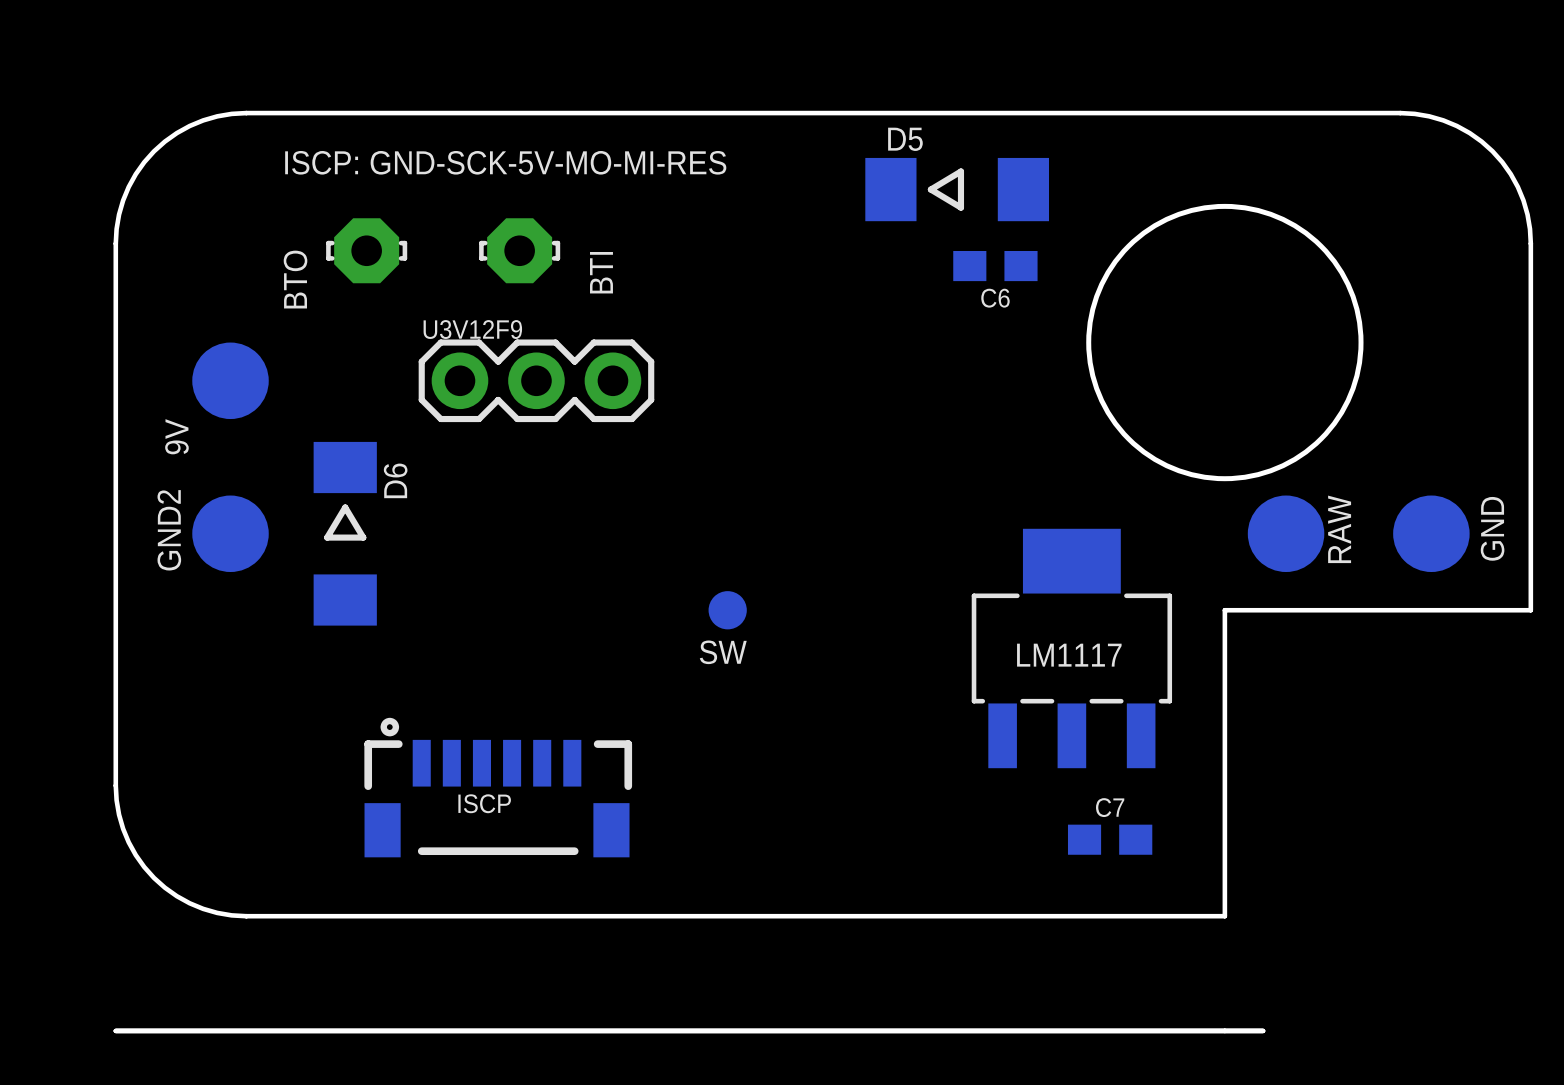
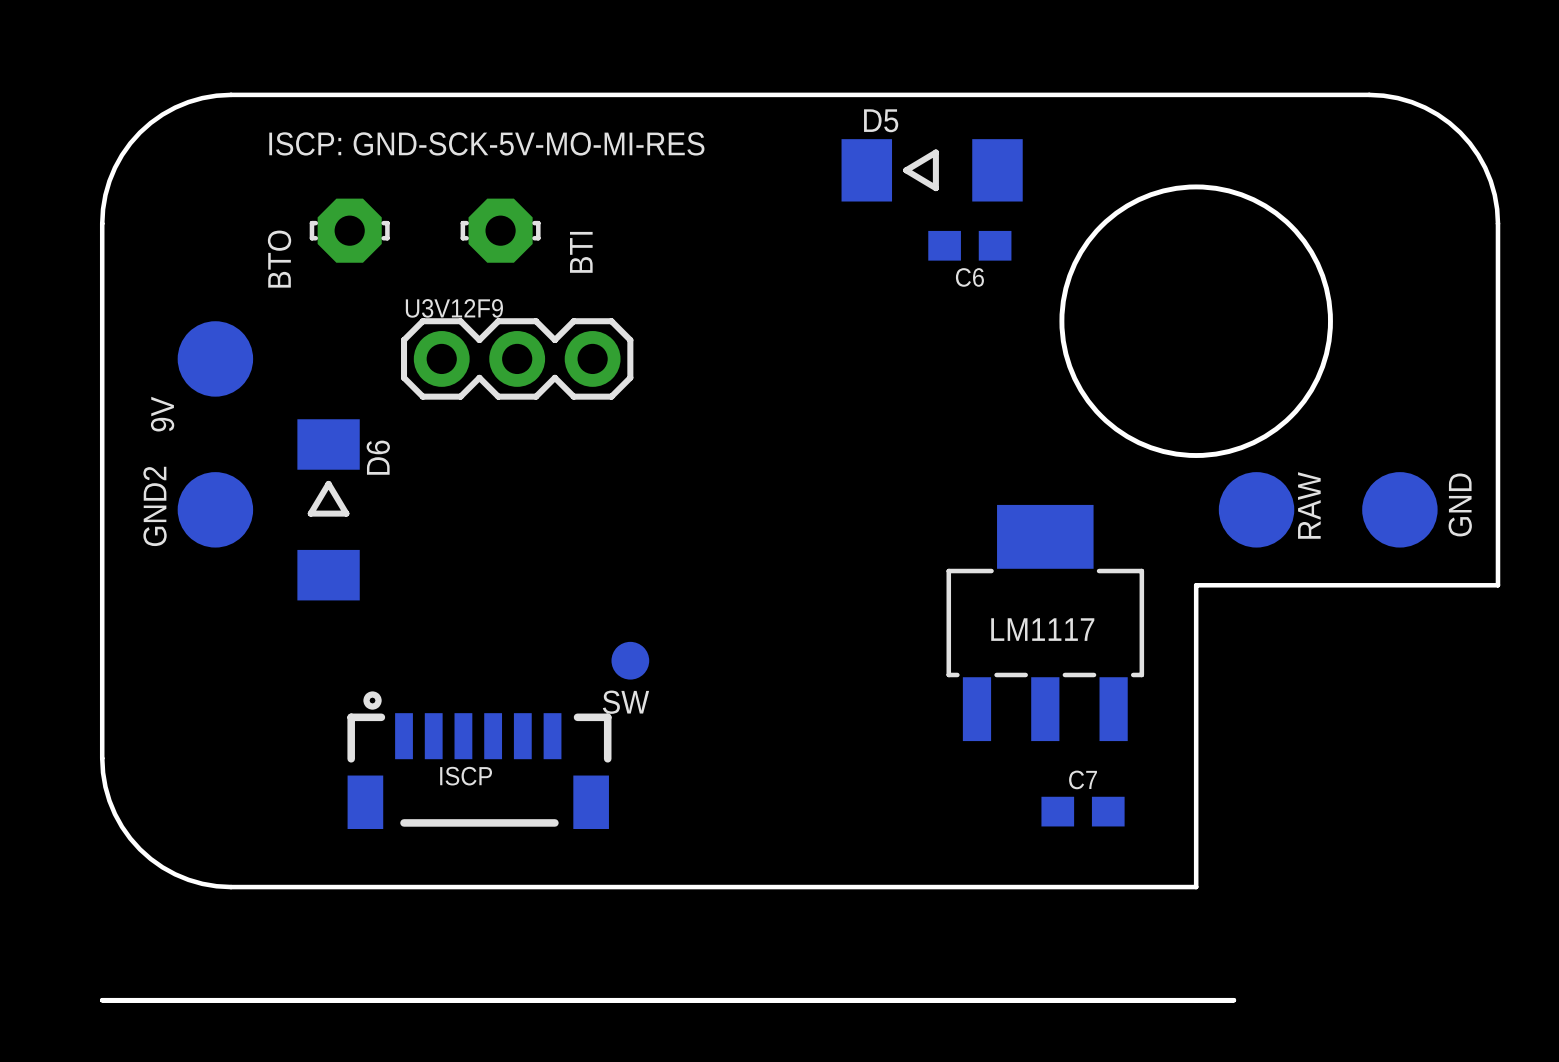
SW position: (727, 610) -> (630, 660)

